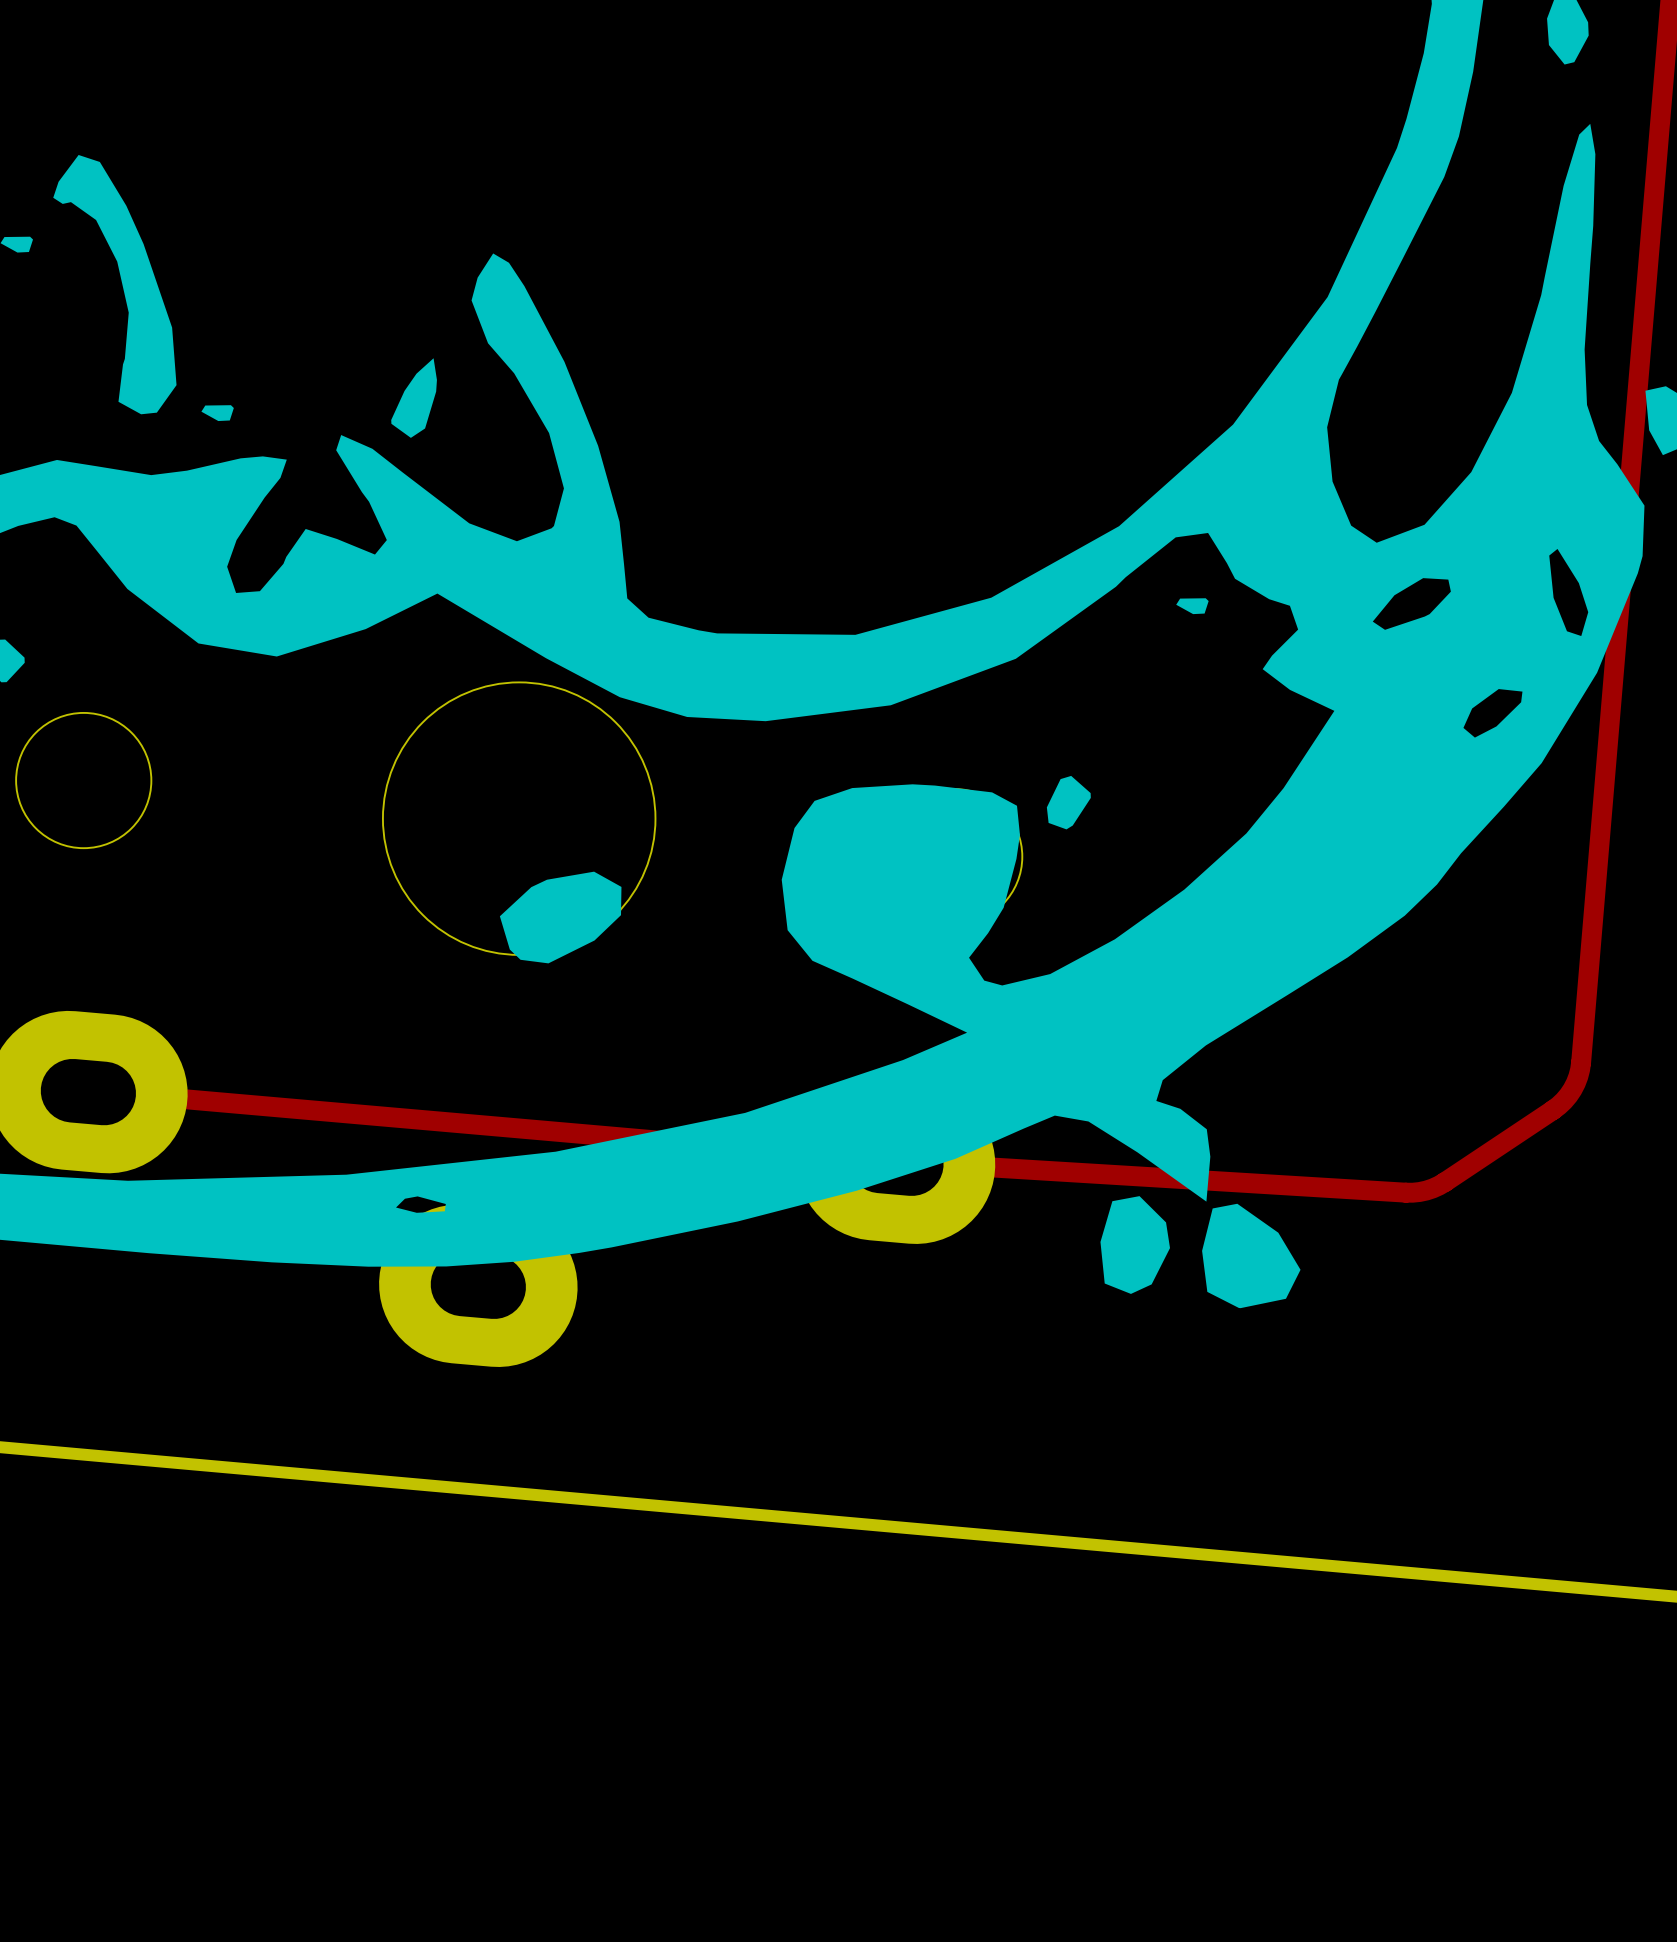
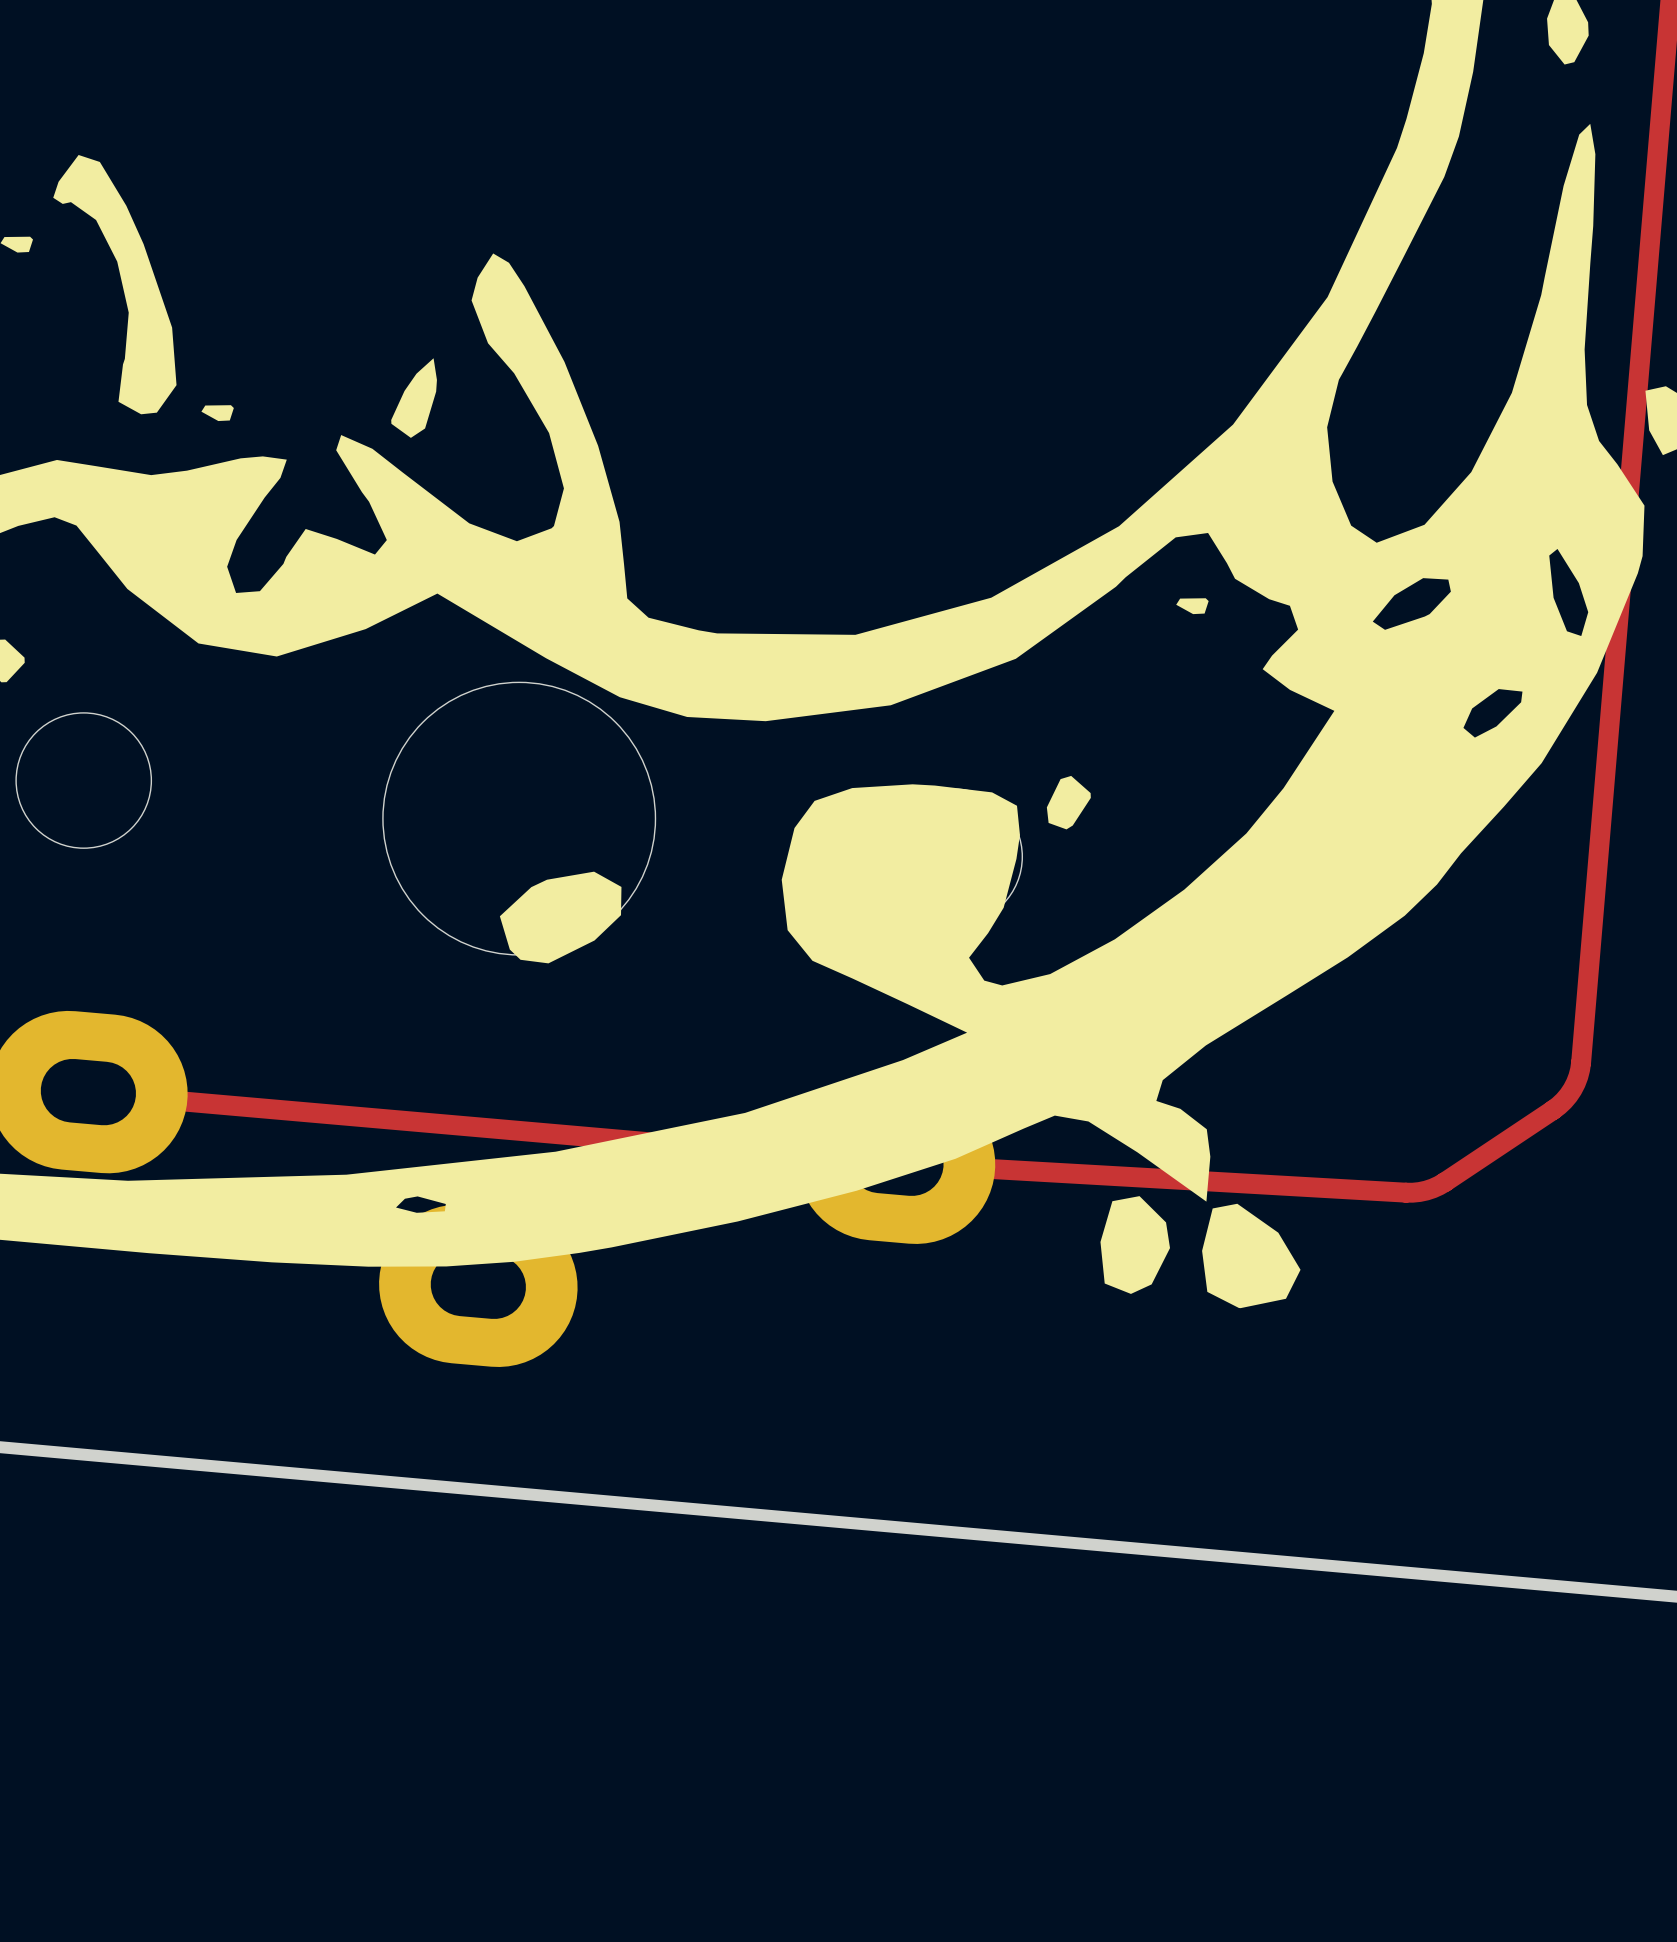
track: (95, 1091) (903, 1162) (1405, 1192) -> (80, 1092) (888, 1163) (1405, 1192)

